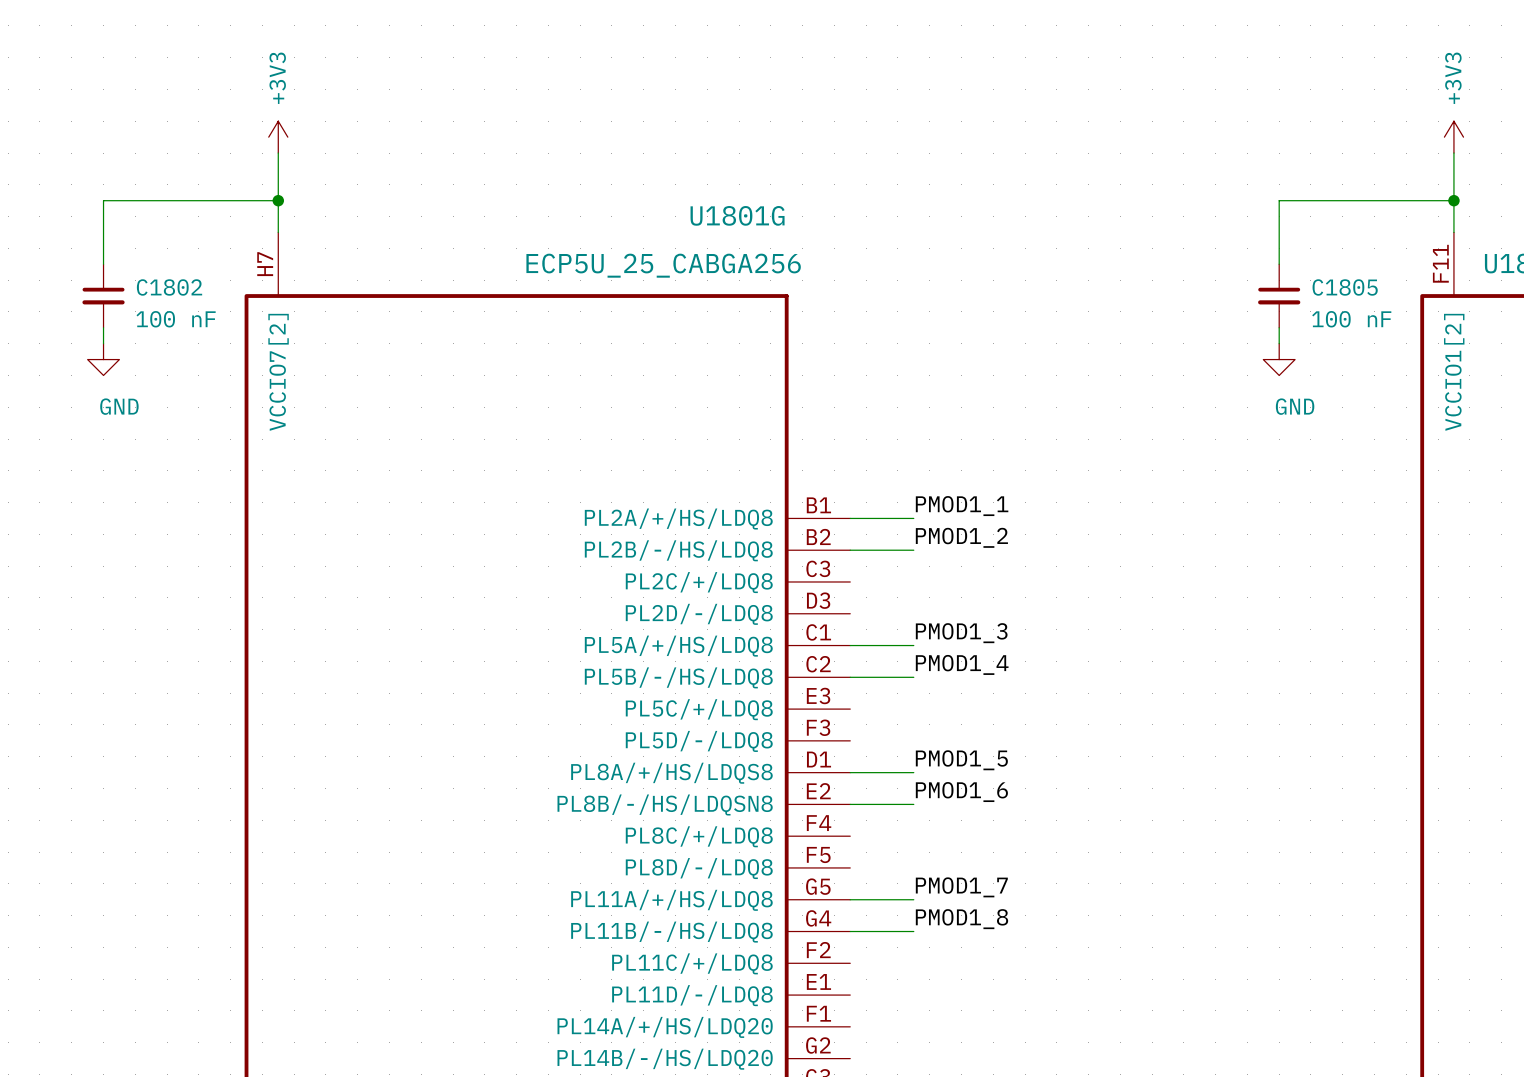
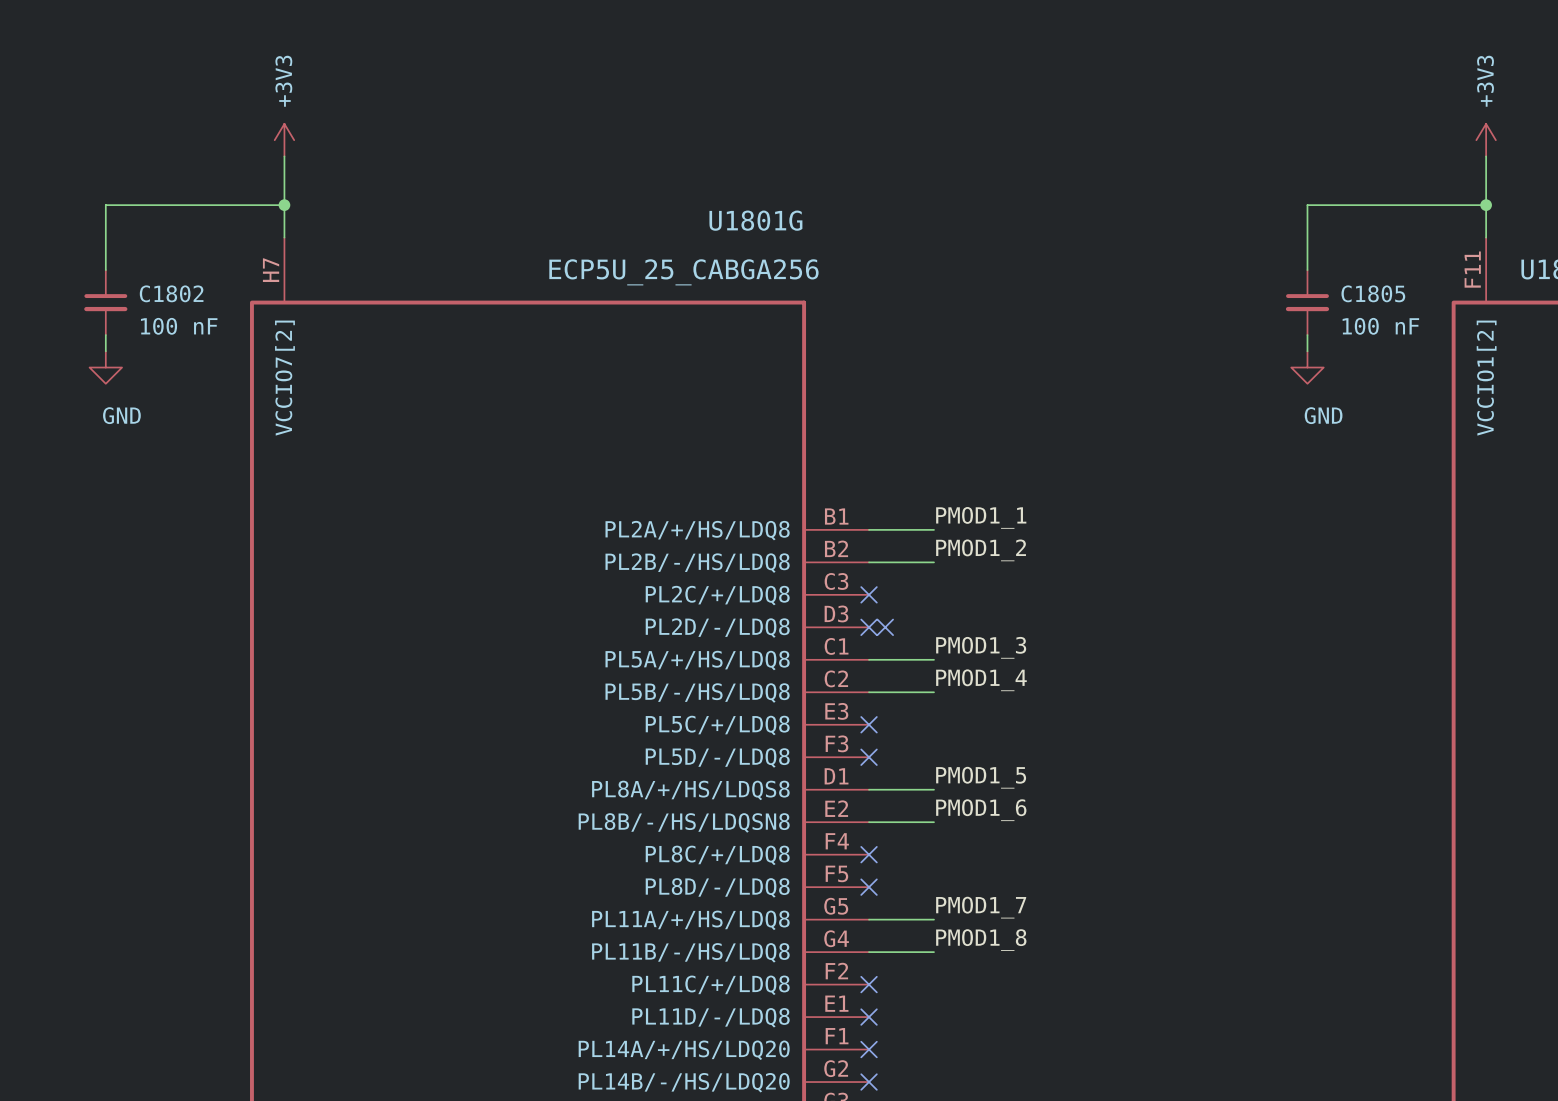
no-connect mark: none -> (869, 594)
no-connect mark: none -> (869, 627)
no-connect mark: none -> (885, 627)
no-connect mark: none -> (869, 724)
no-connect mark: none -> (869, 757)
no-connect mark: none -> (869, 854)
no-connect mark: none -> (869, 887)
no-connect mark: none -> (869, 984)
no-connect mark: none -> (869, 1017)
no-connect mark: none -> (869, 1049)
no-connect mark: none -> (869, 1082)

